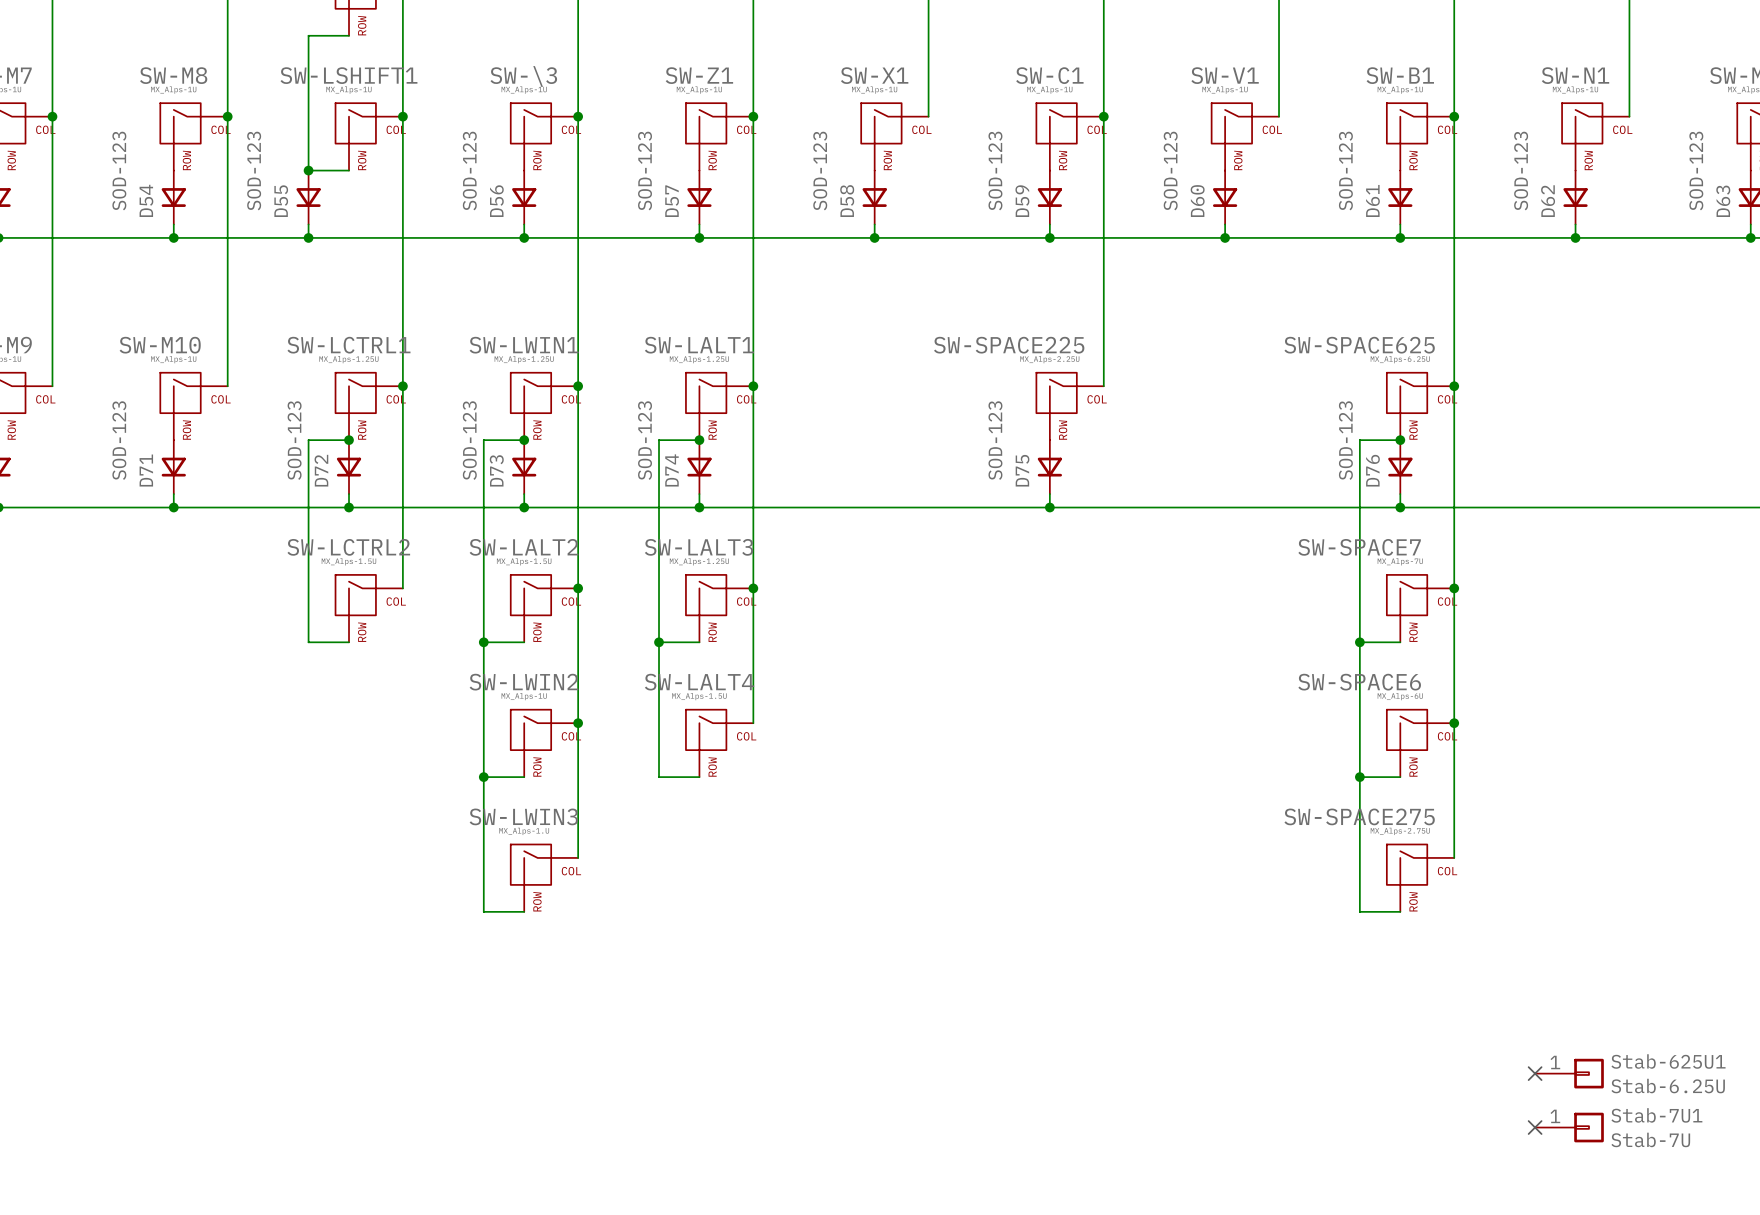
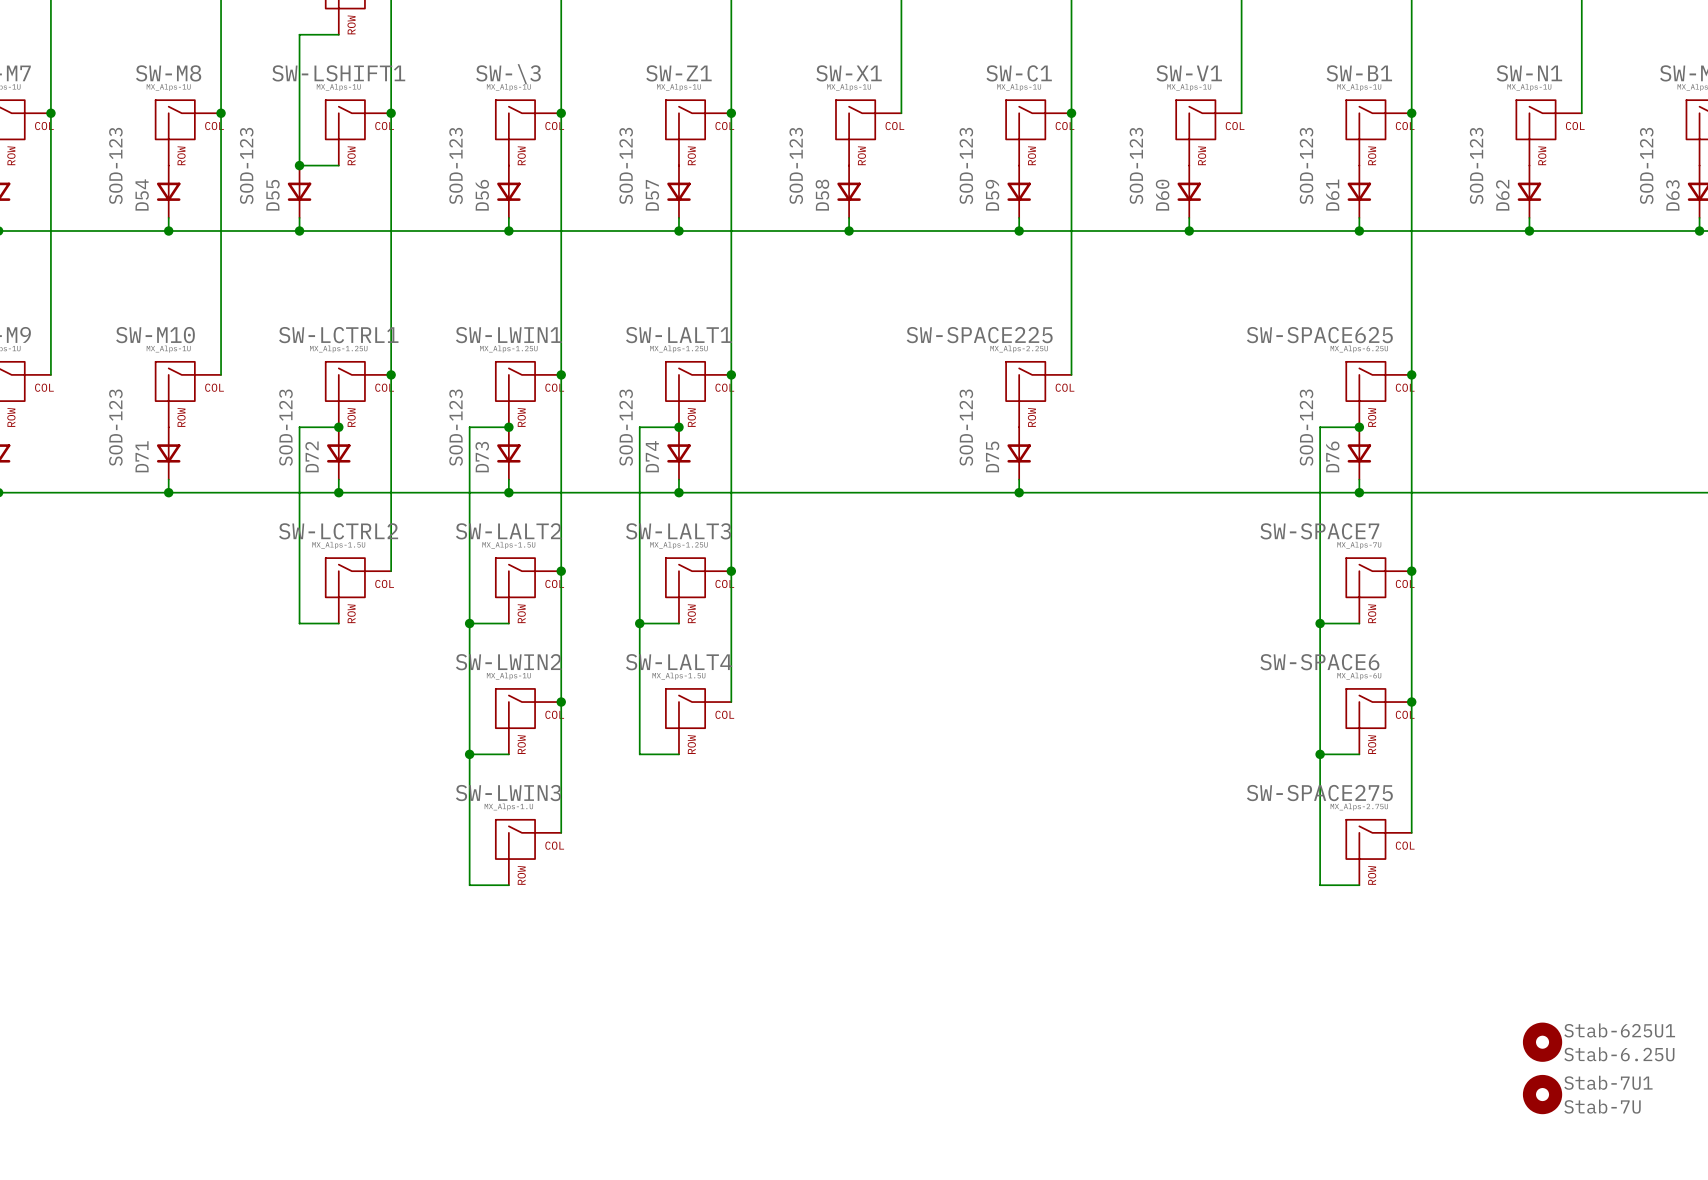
Stab-625U1 symbol: [1535, 1058, 1604, 1089] -> [1522, 1022, 1563, 1062]
no-connect mark: (1535, 1073) -> none
Stab-7U1 symbol: [1535, 1112, 1604, 1143] -> [1522, 1074, 1563, 1115]
no-connect mark: (1535, 1127) -> none

